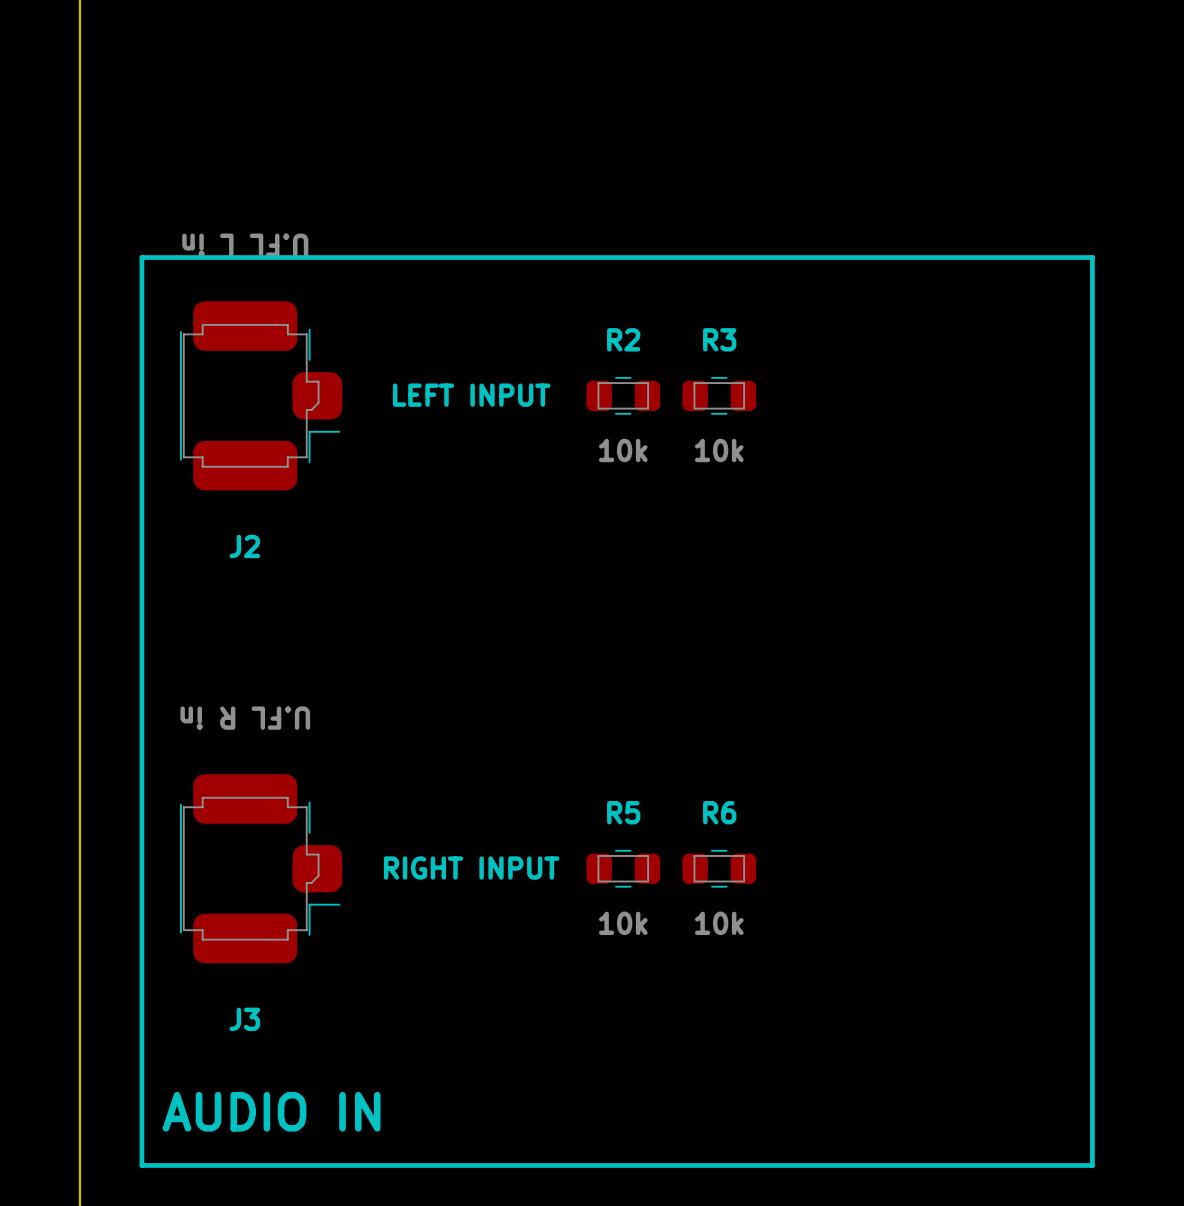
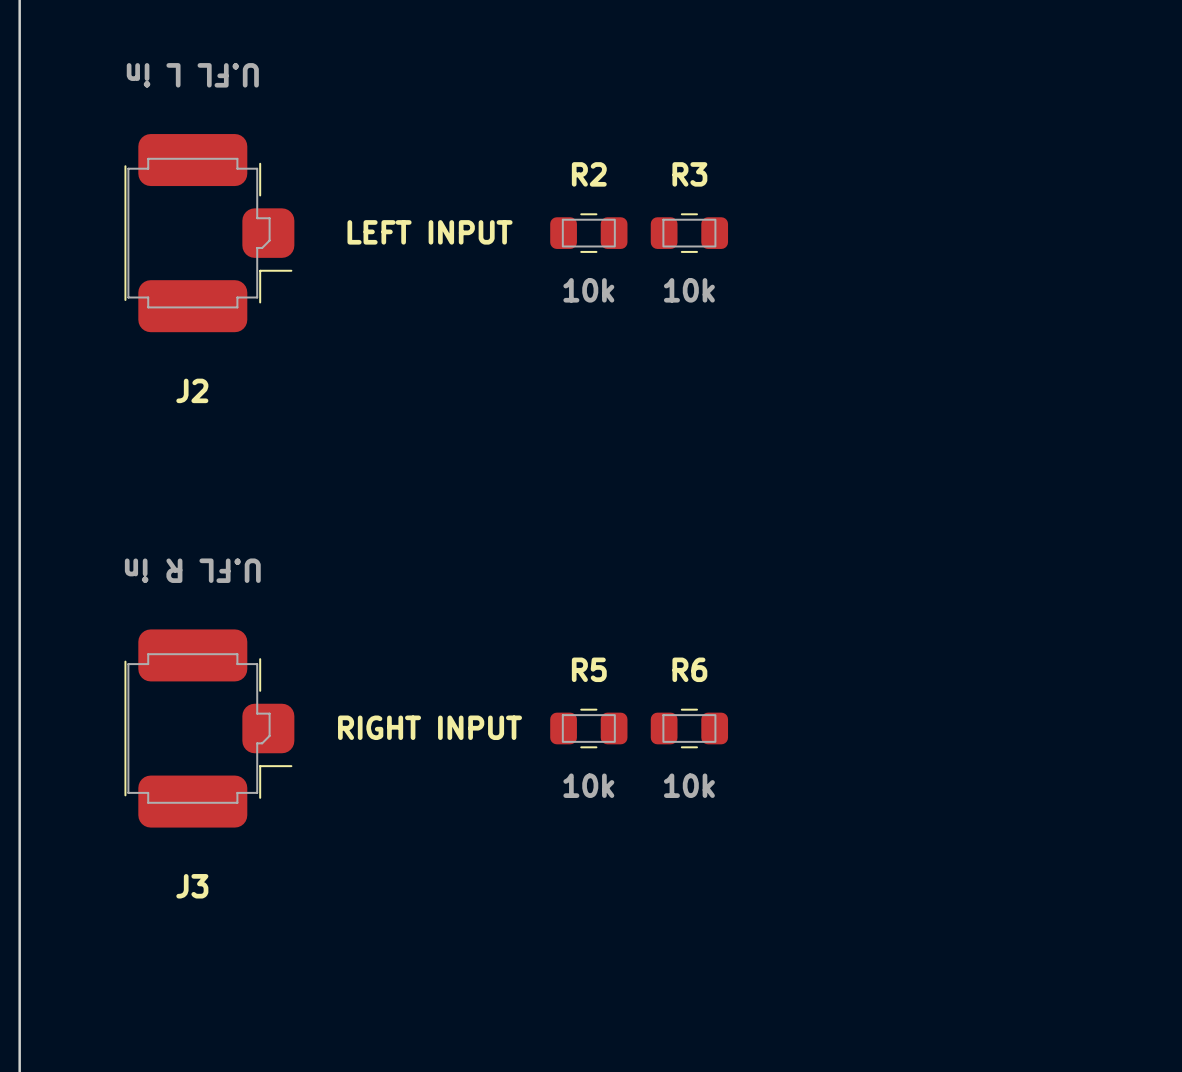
line: (141, 257) (1092, 257) (1092, 1165) (141, 1165) (141, 257) -> none
text: AUDIO IN (271, 1111) -> none

